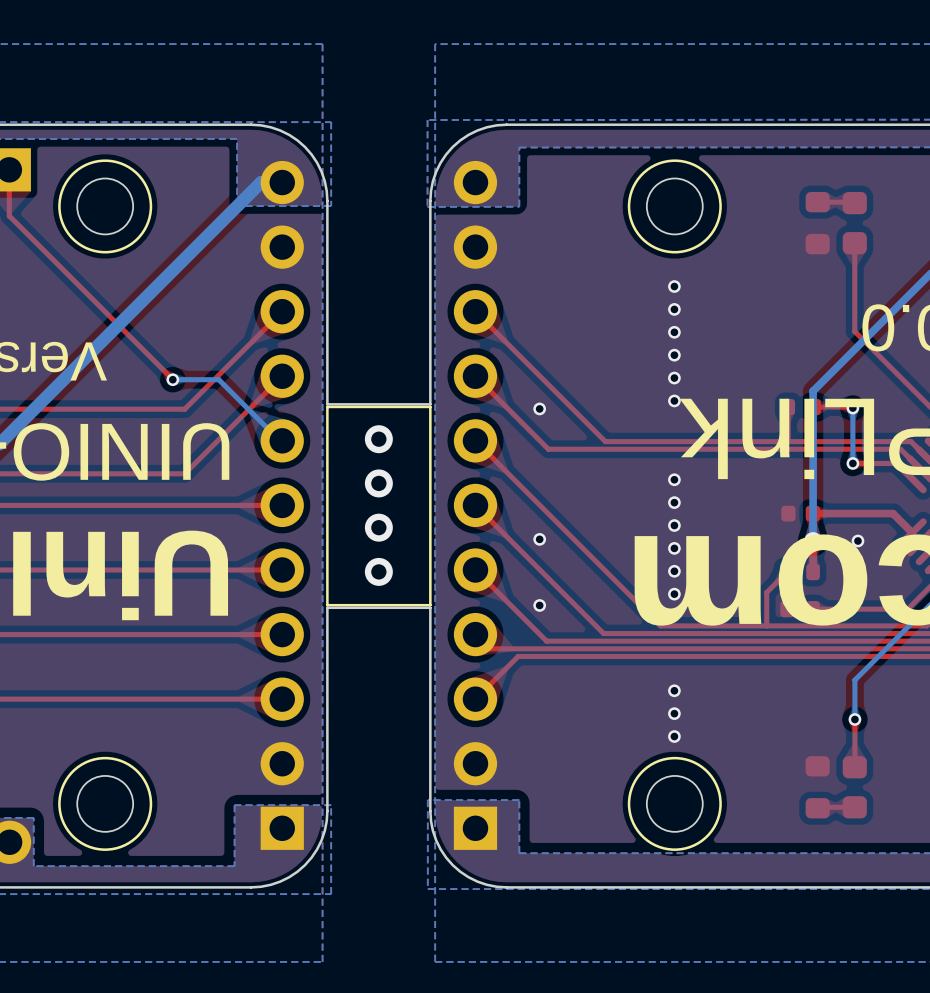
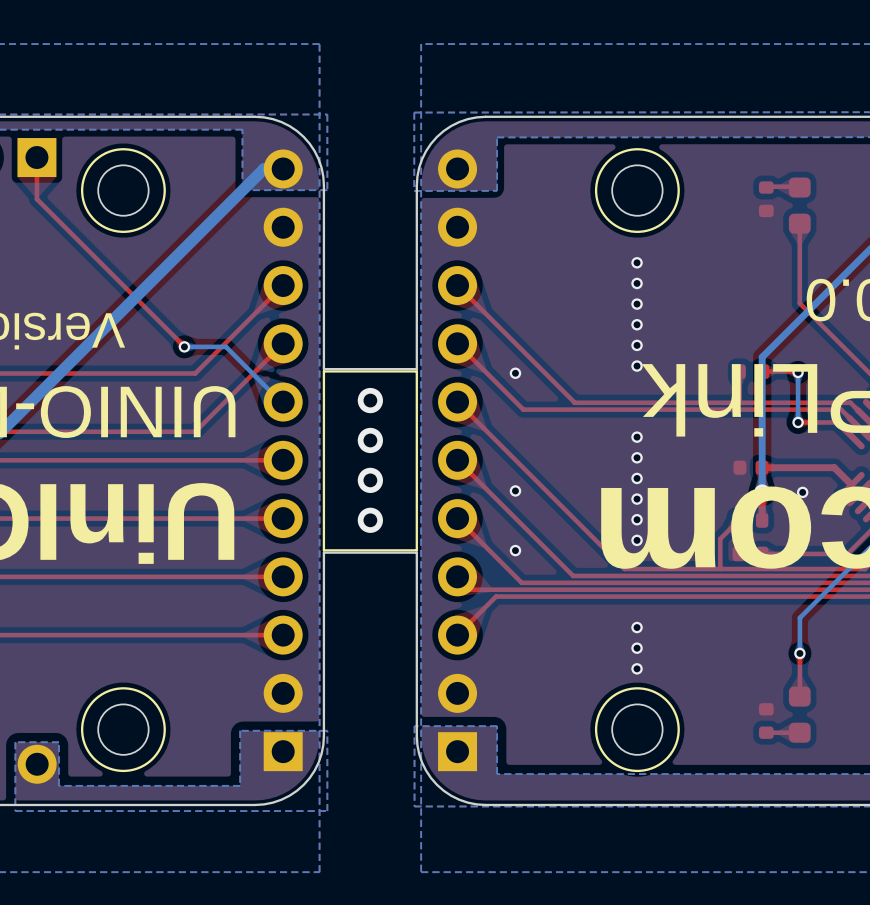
part footprint: [805, 191, 830, 255] -> [758, 181, 774, 218]
part footprint: [805, 756, 830, 819] -> [758, 703, 774, 739]

